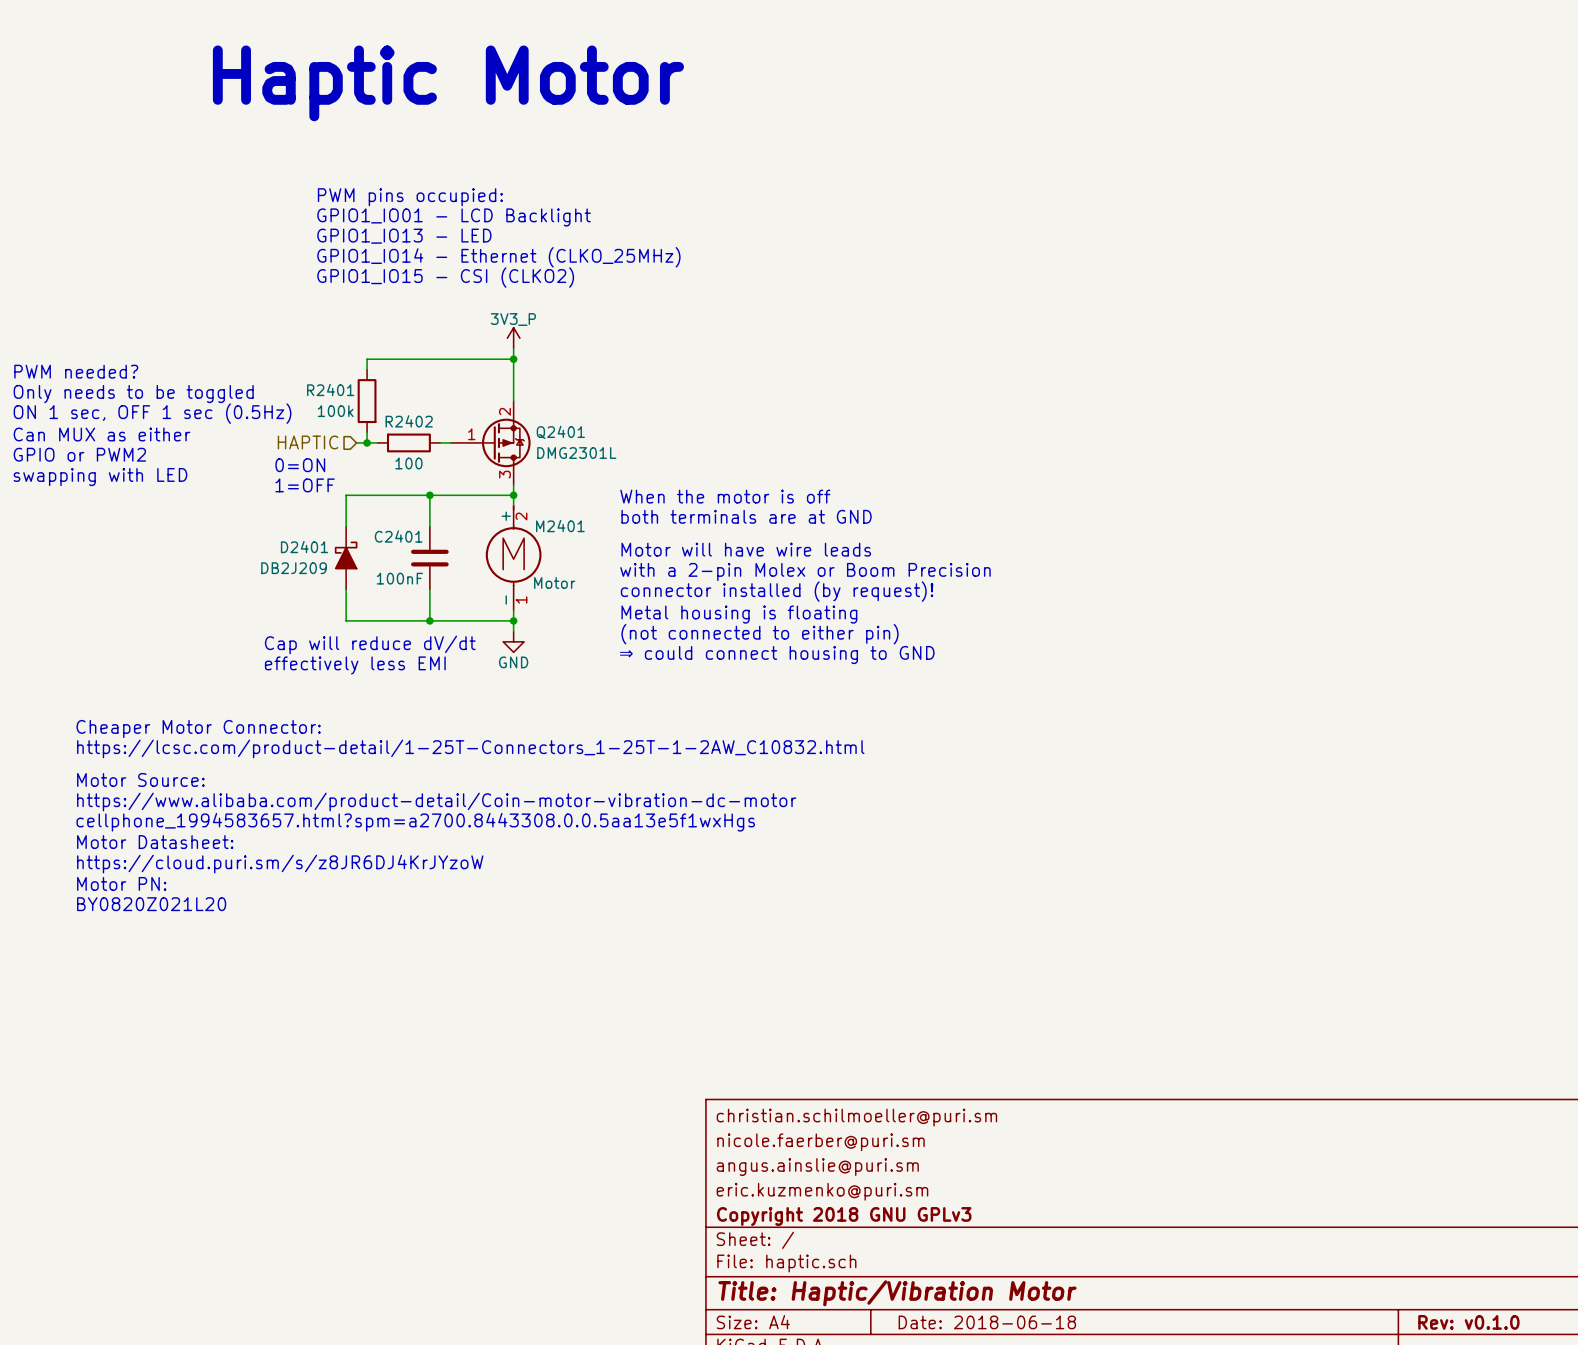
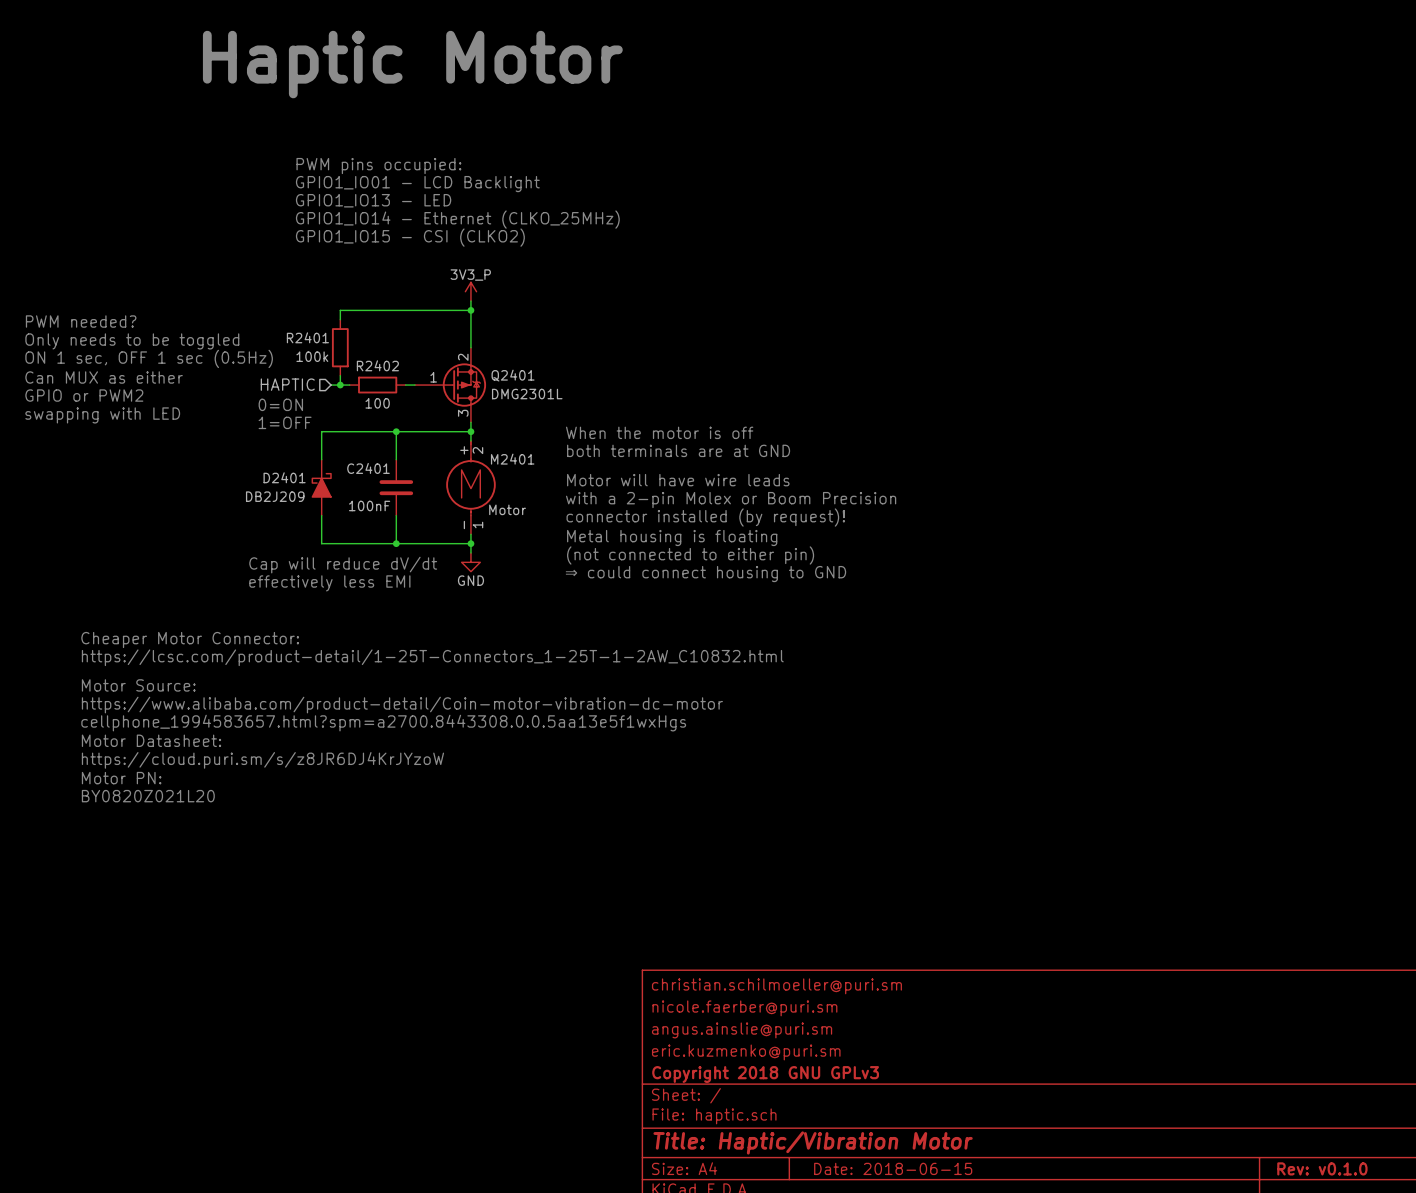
title block: Date: 2018-06-18 (987, 1322) -> Date: 2018-06-15 (893, 1168)

